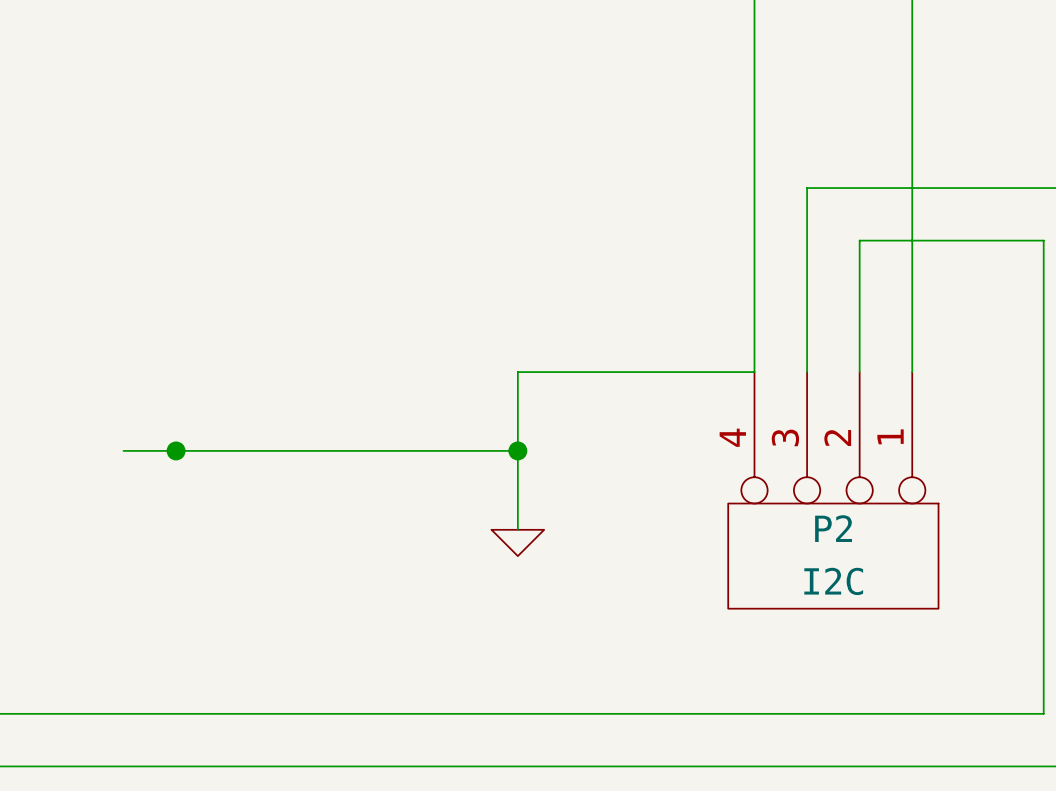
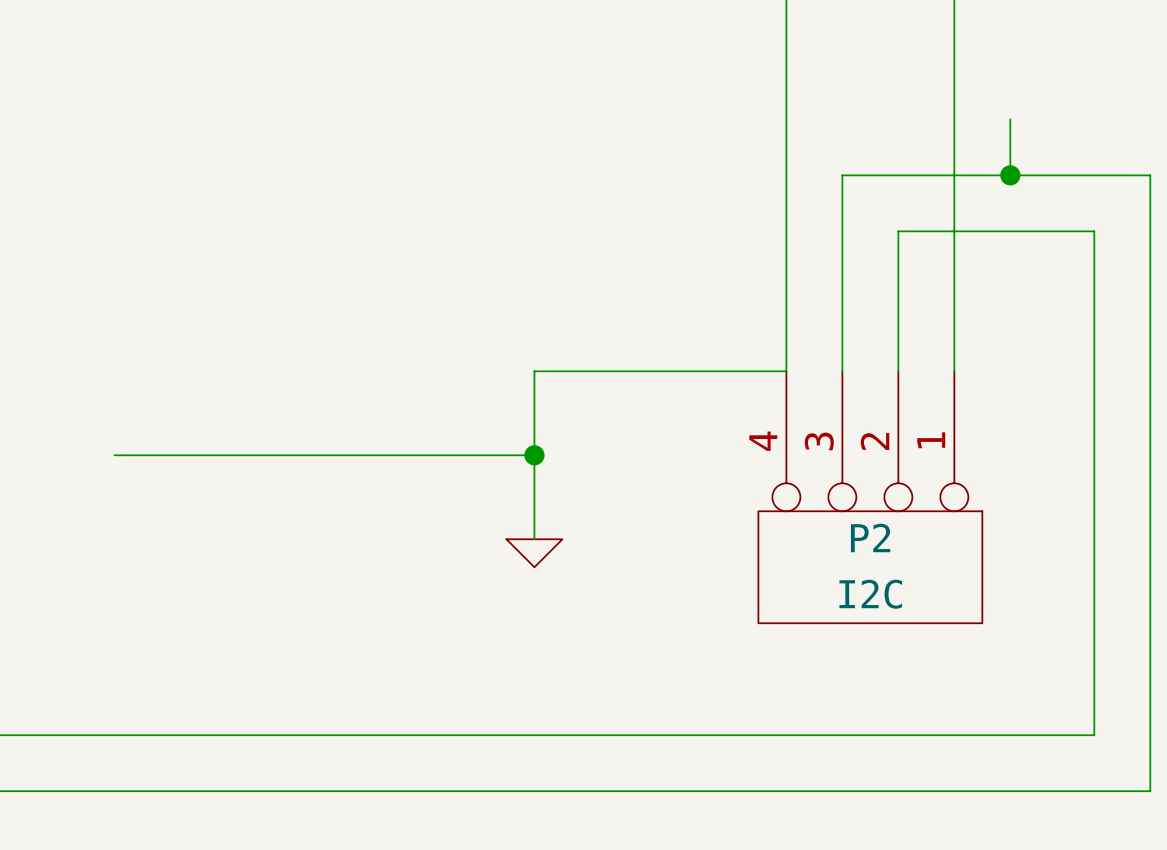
wire: none -> (1010, 119) (1010, 175)
junction: none -> (1010, 175)
junction: (176, 450) -> none

